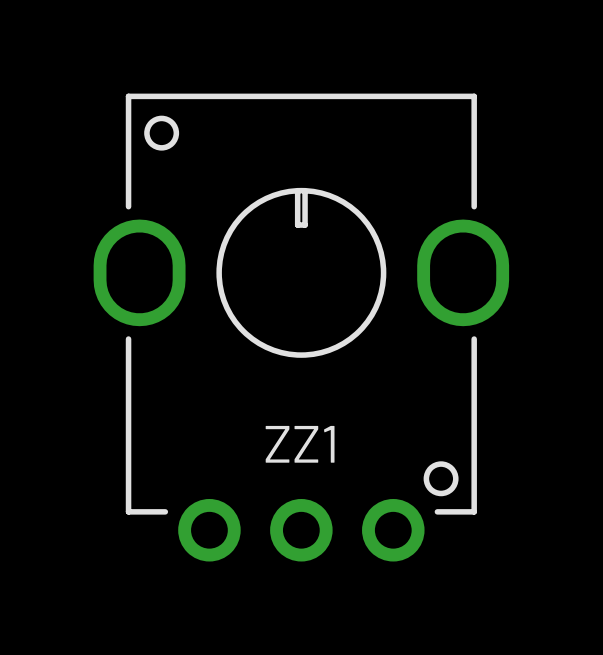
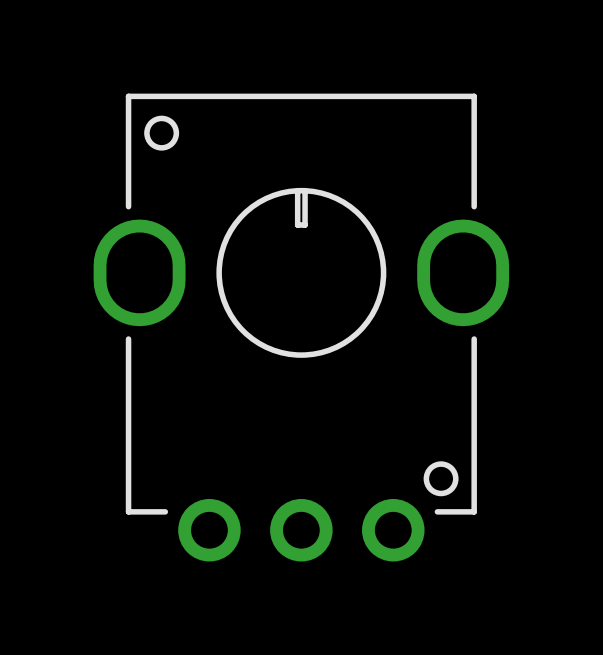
ZZ1 name: ZZ1 (300, 444) -> none

